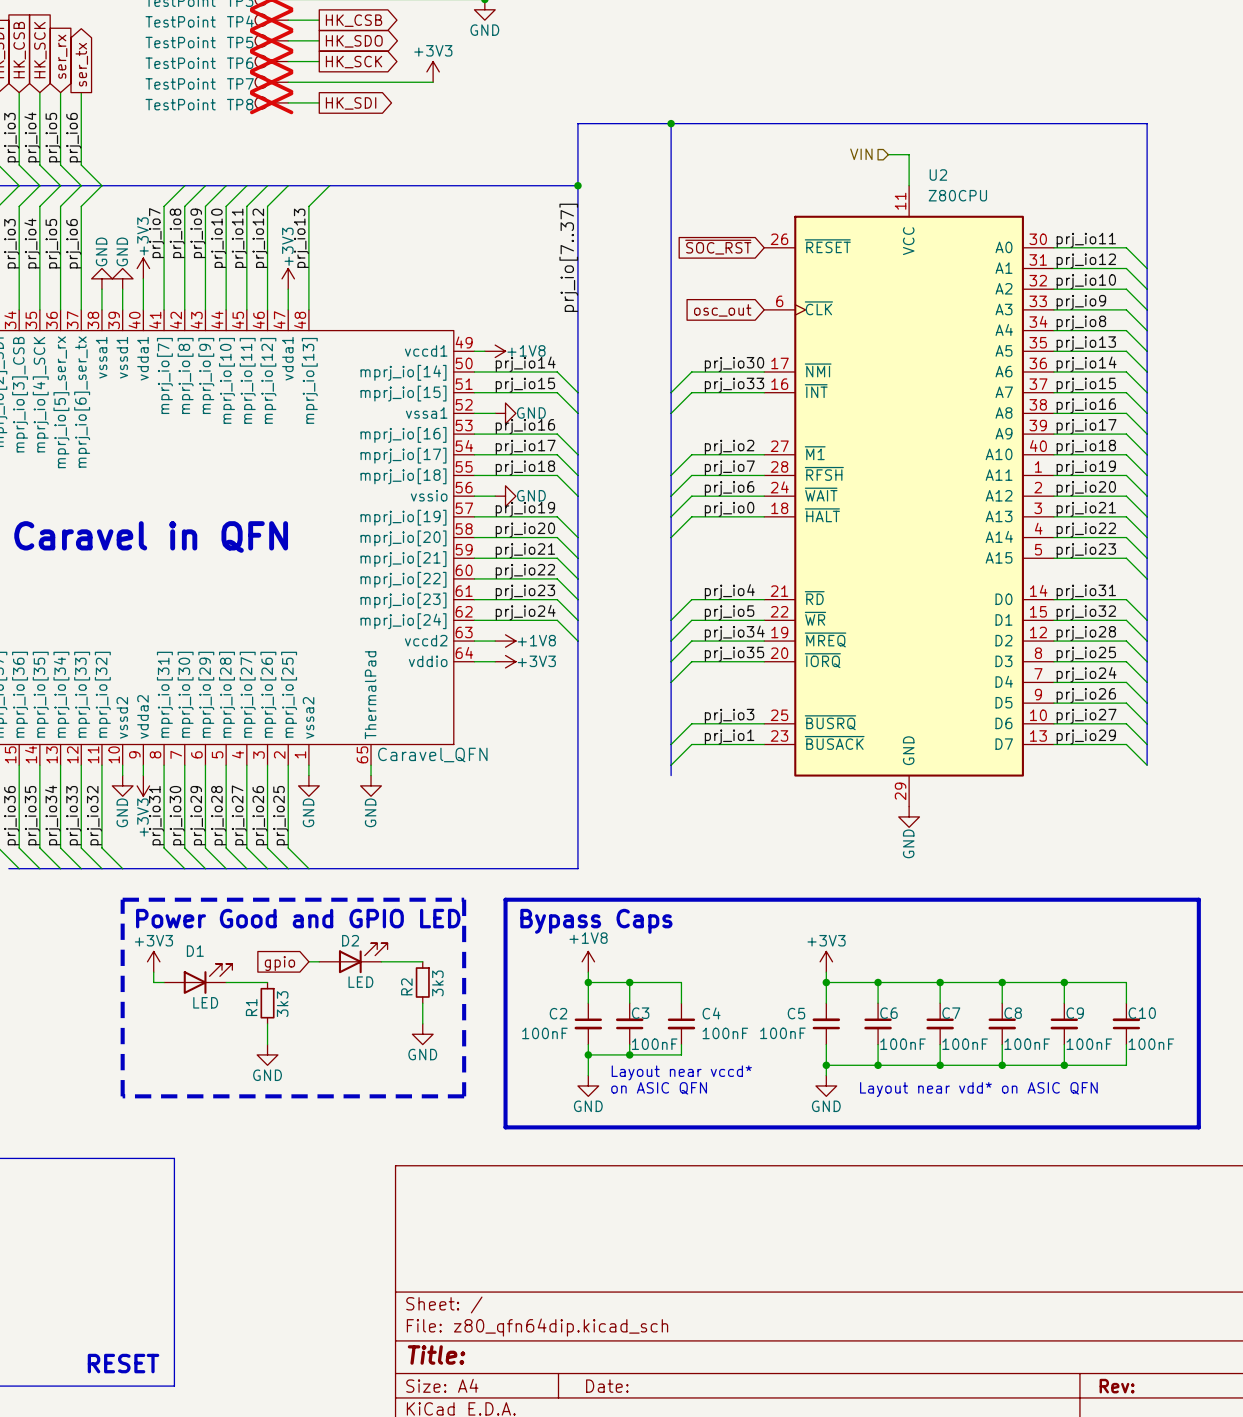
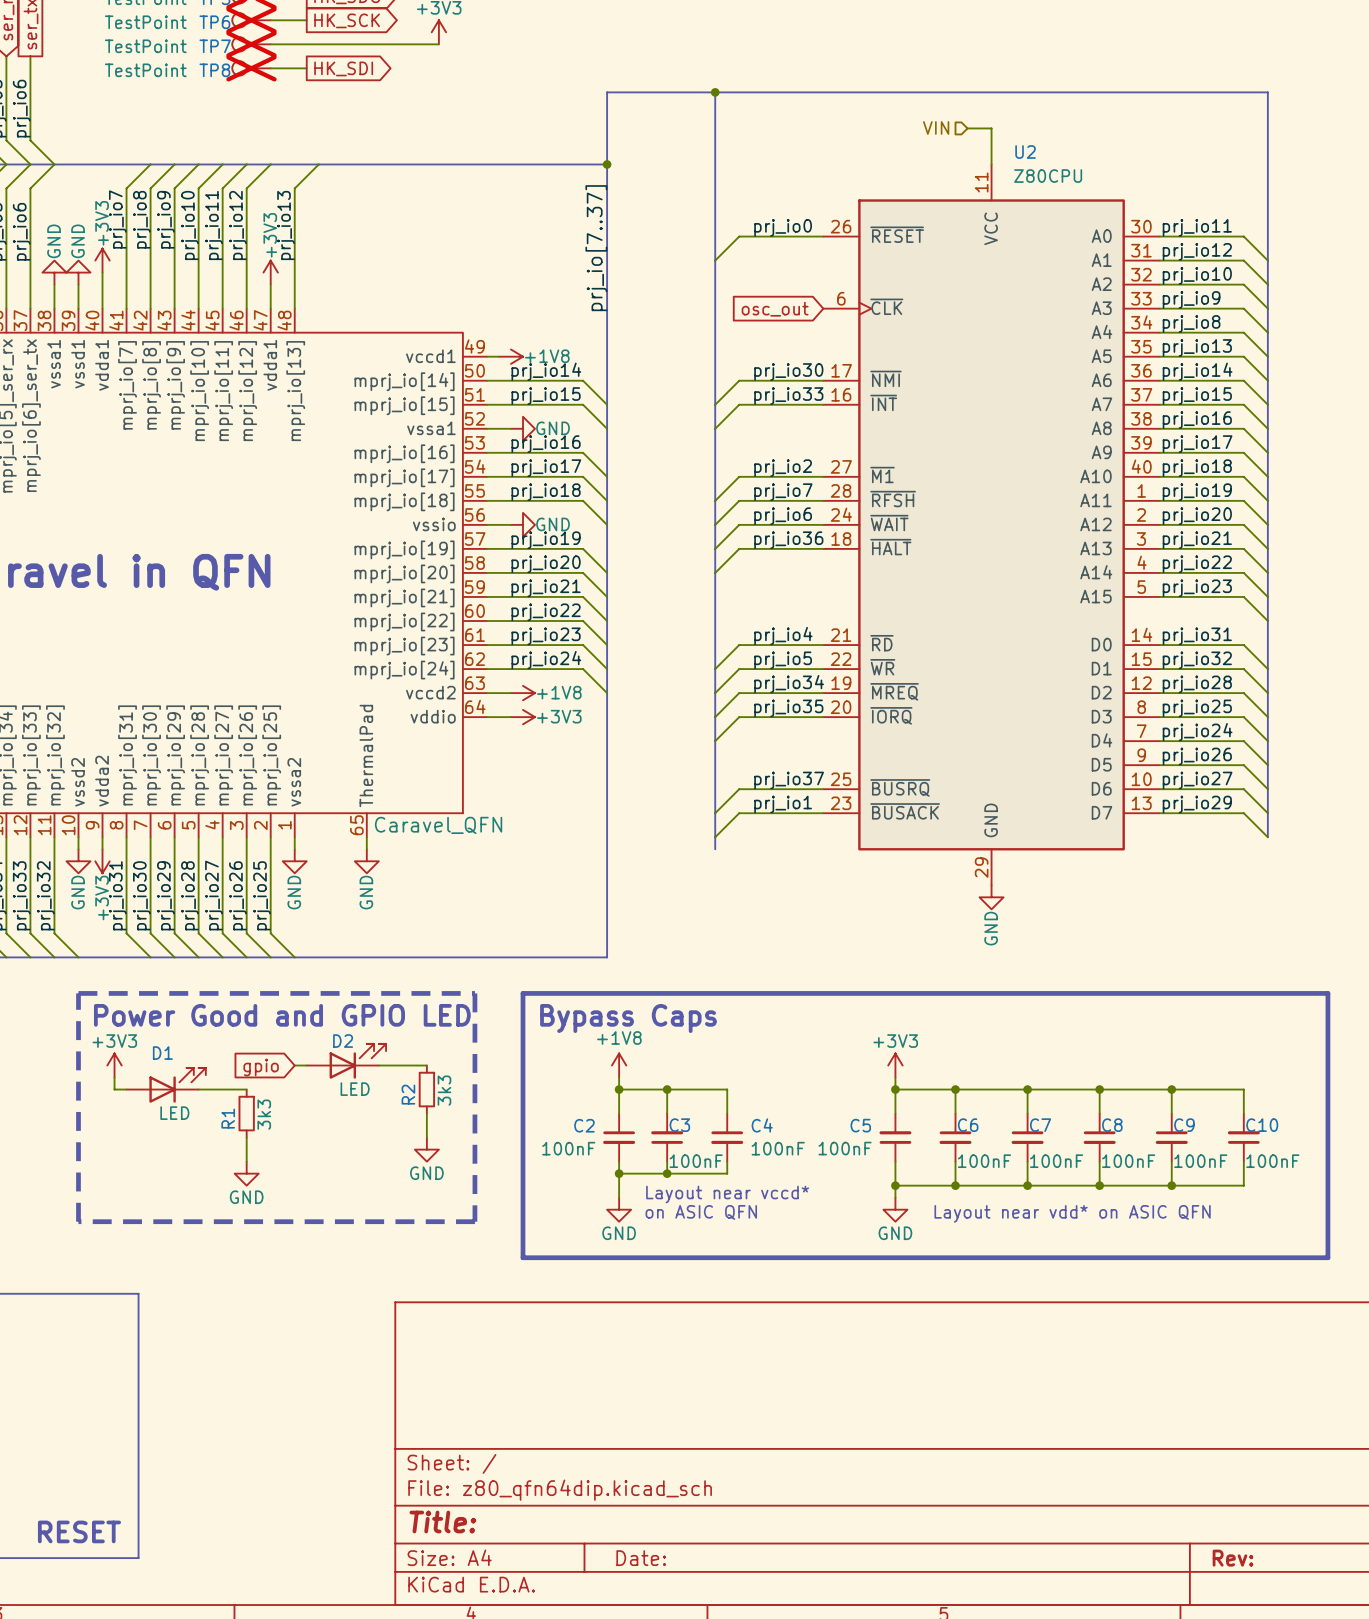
label: none -> prj_io0 (783, 227)
global label: ~{SOC_RST} (718, 247) -> none
wire: none -> (823, 236) (739, 236) (715, 260)
label: prj_io0 (729, 509) -> prj_io36 (788, 540)
label: prj_io3 (729, 716) -> prj_io37 (789, 780)

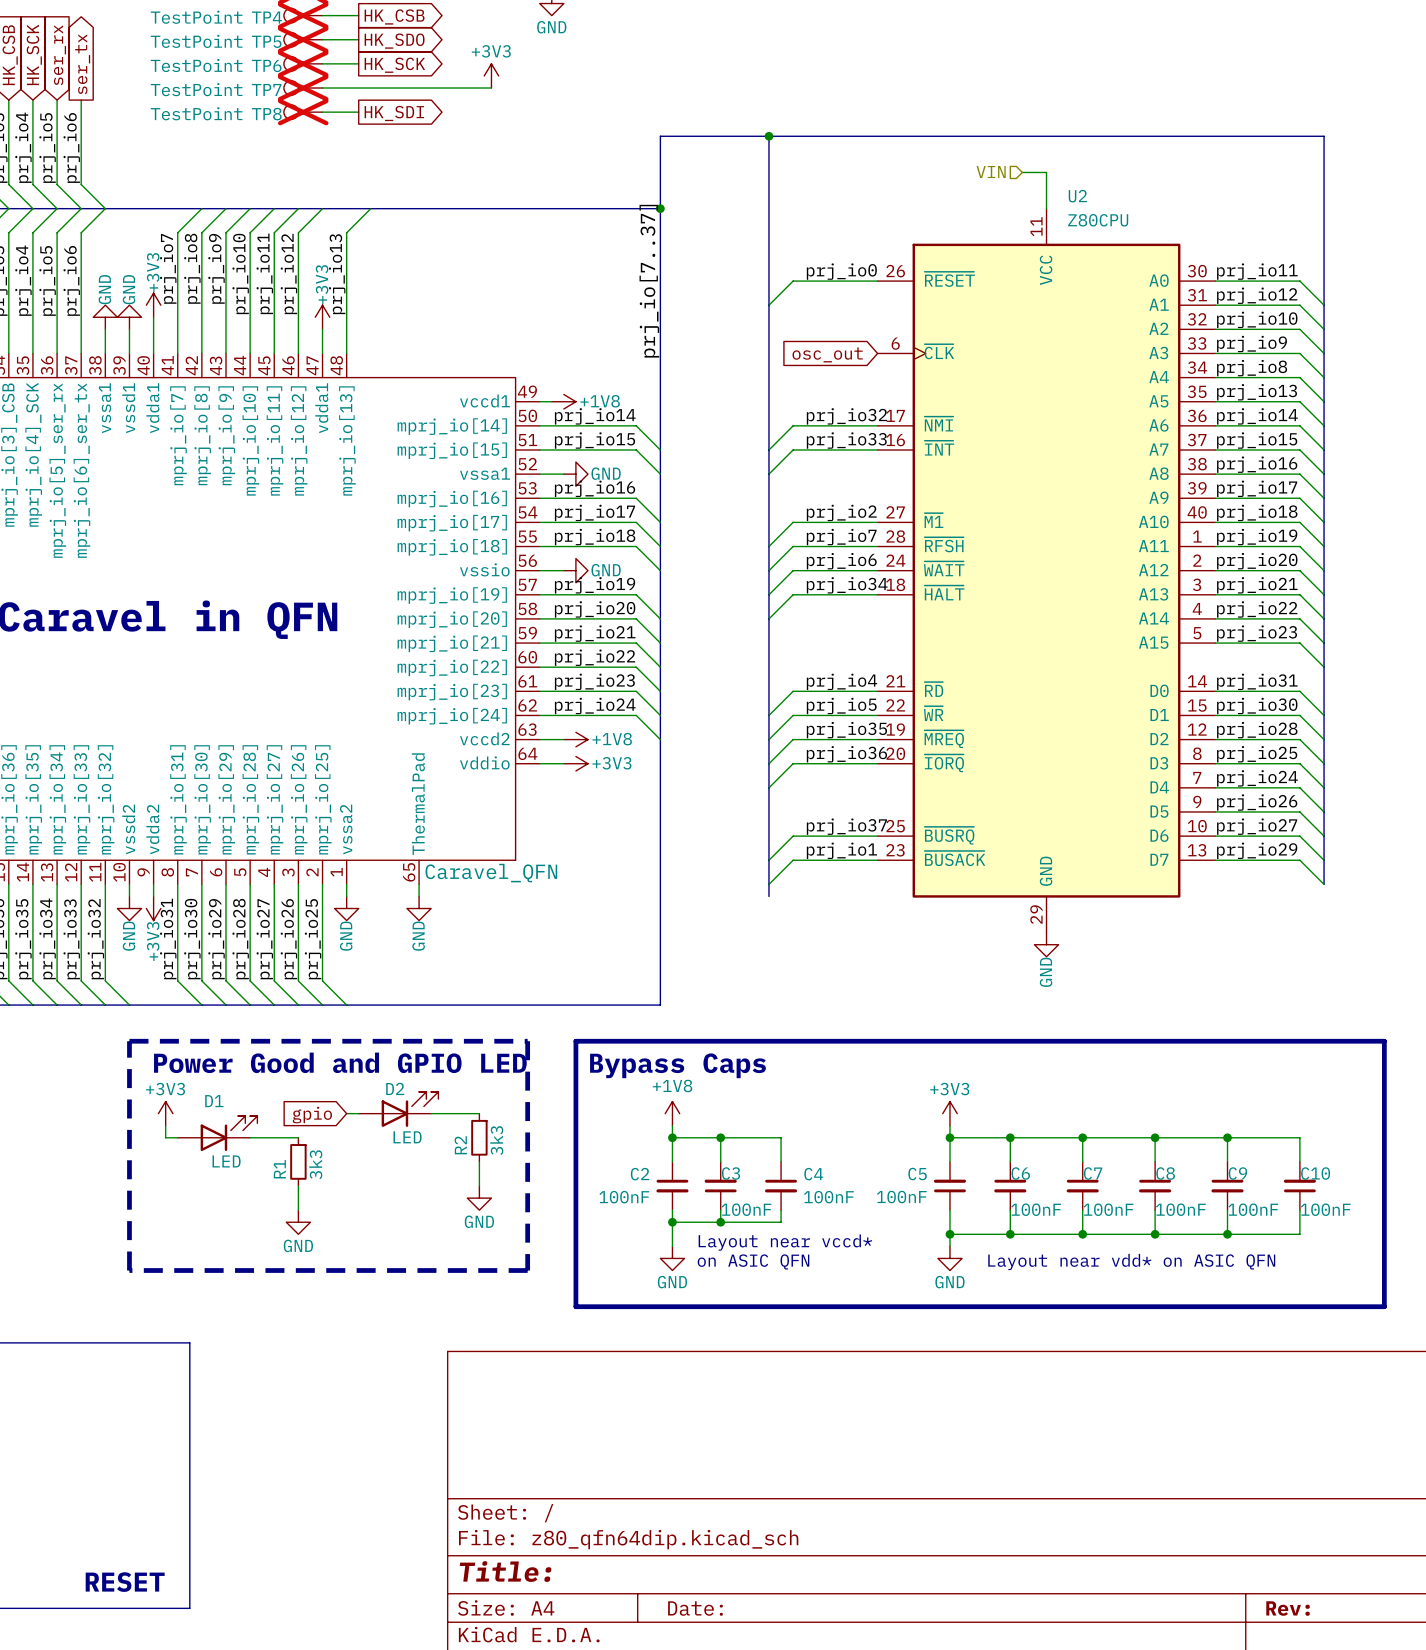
label: prj_io30 (788, 372) -> prj_io32 (846, 416)
label: prj_io36 (788, 540) -> prj_io34 (847, 585)
label: prj_io32 (1197, 660) -> prj_io30 (1257, 705)
label: prj_io34 (789, 684) -> prj_io35 (846, 730)
label: prj_io35 (788, 708) -> prj_io36 (846, 754)

